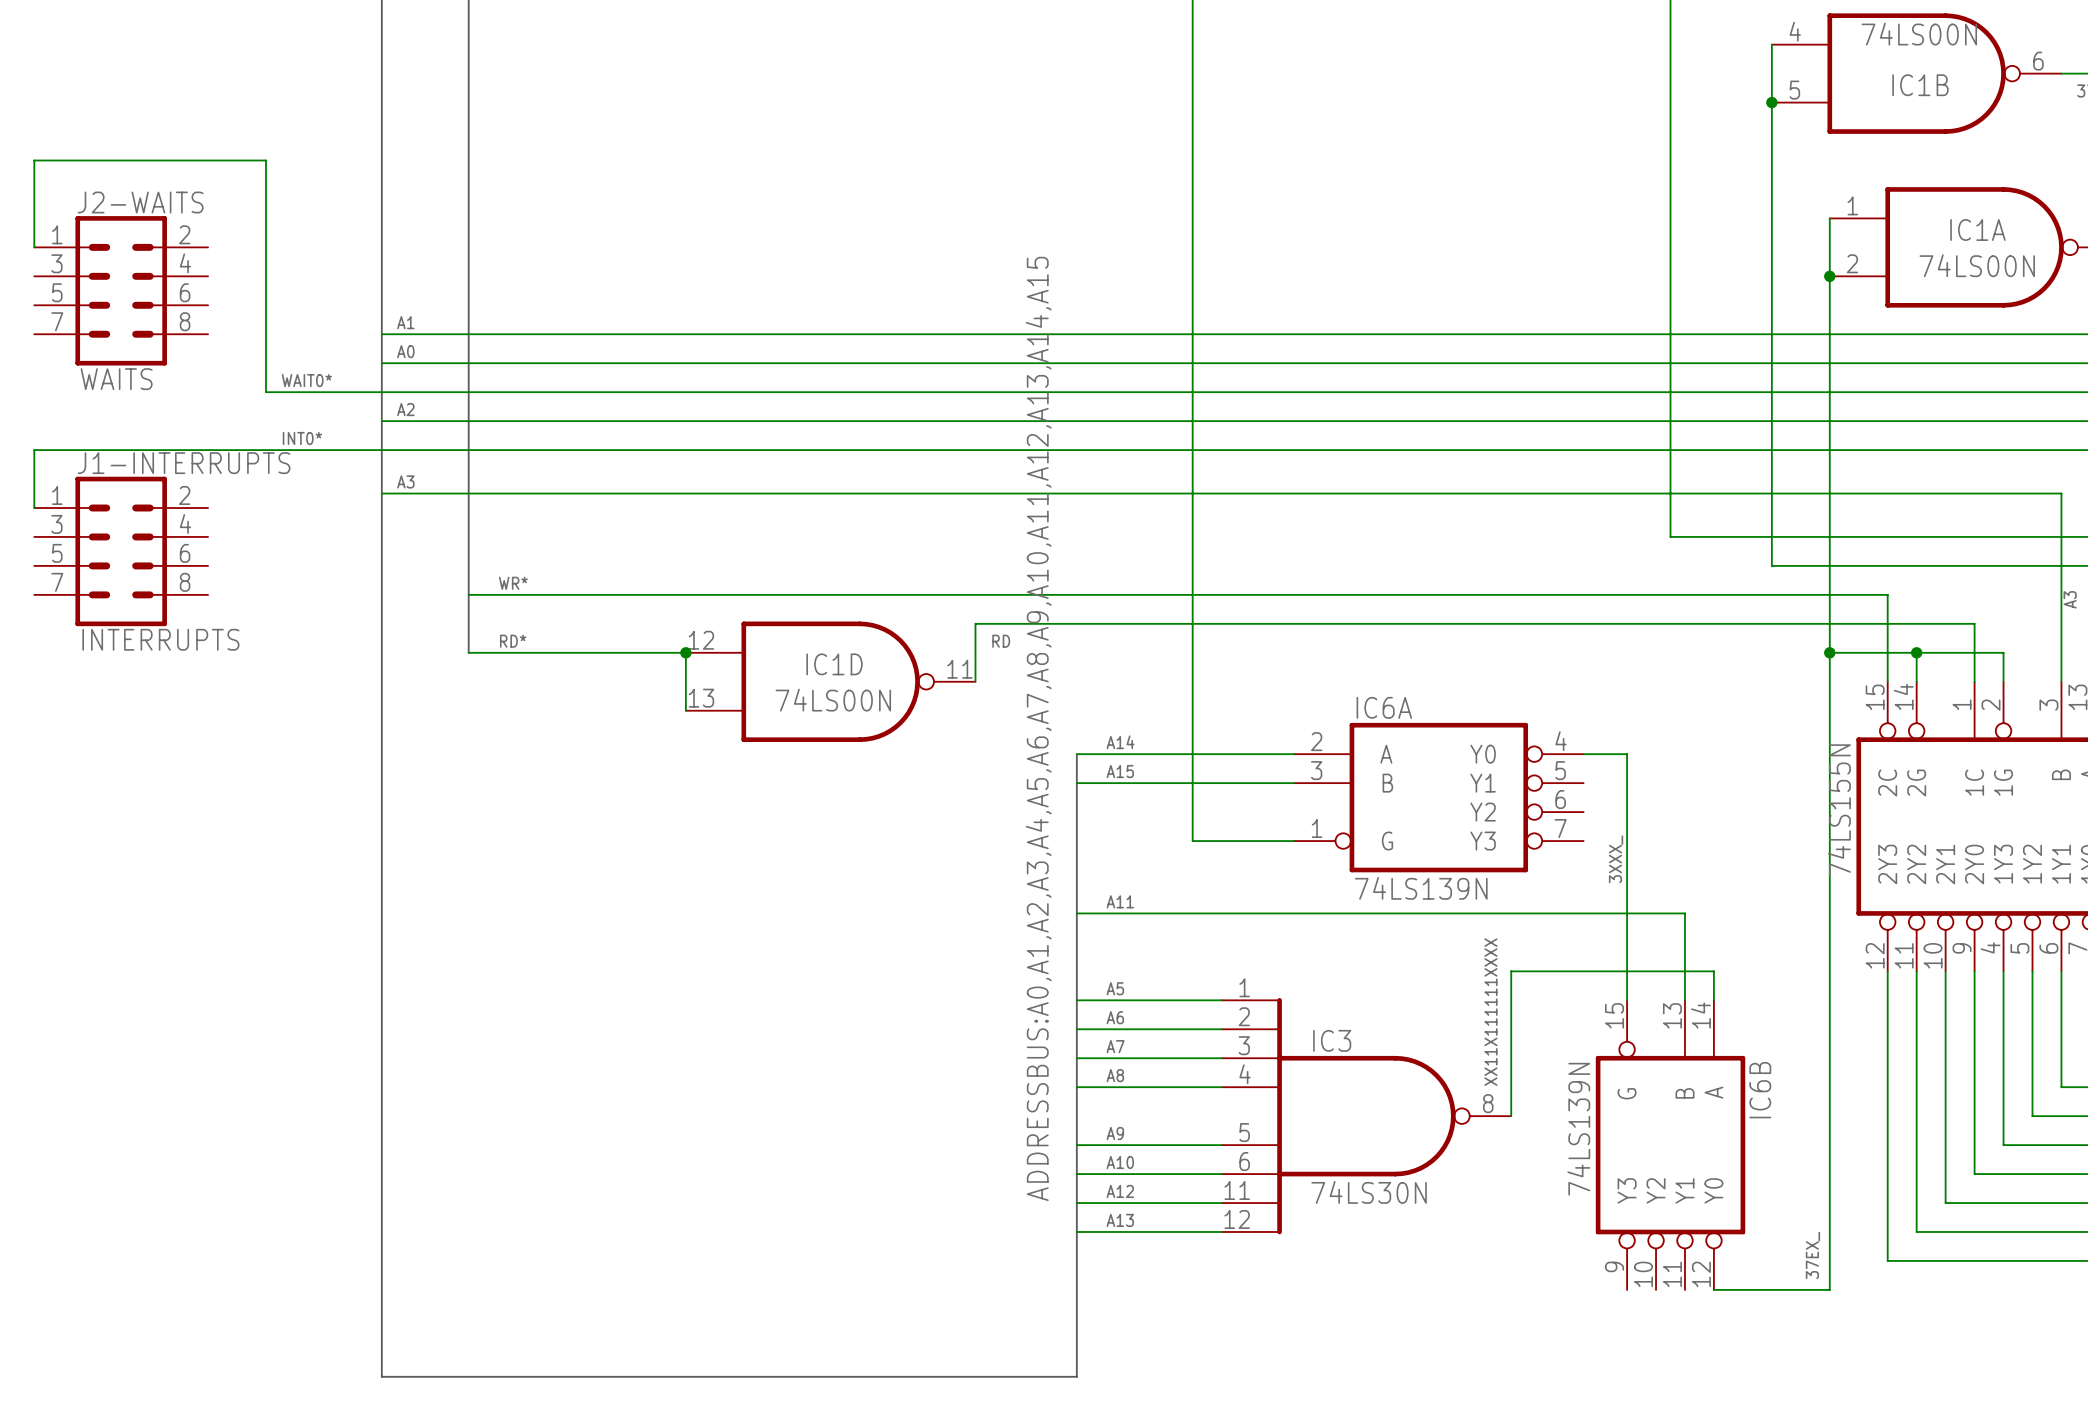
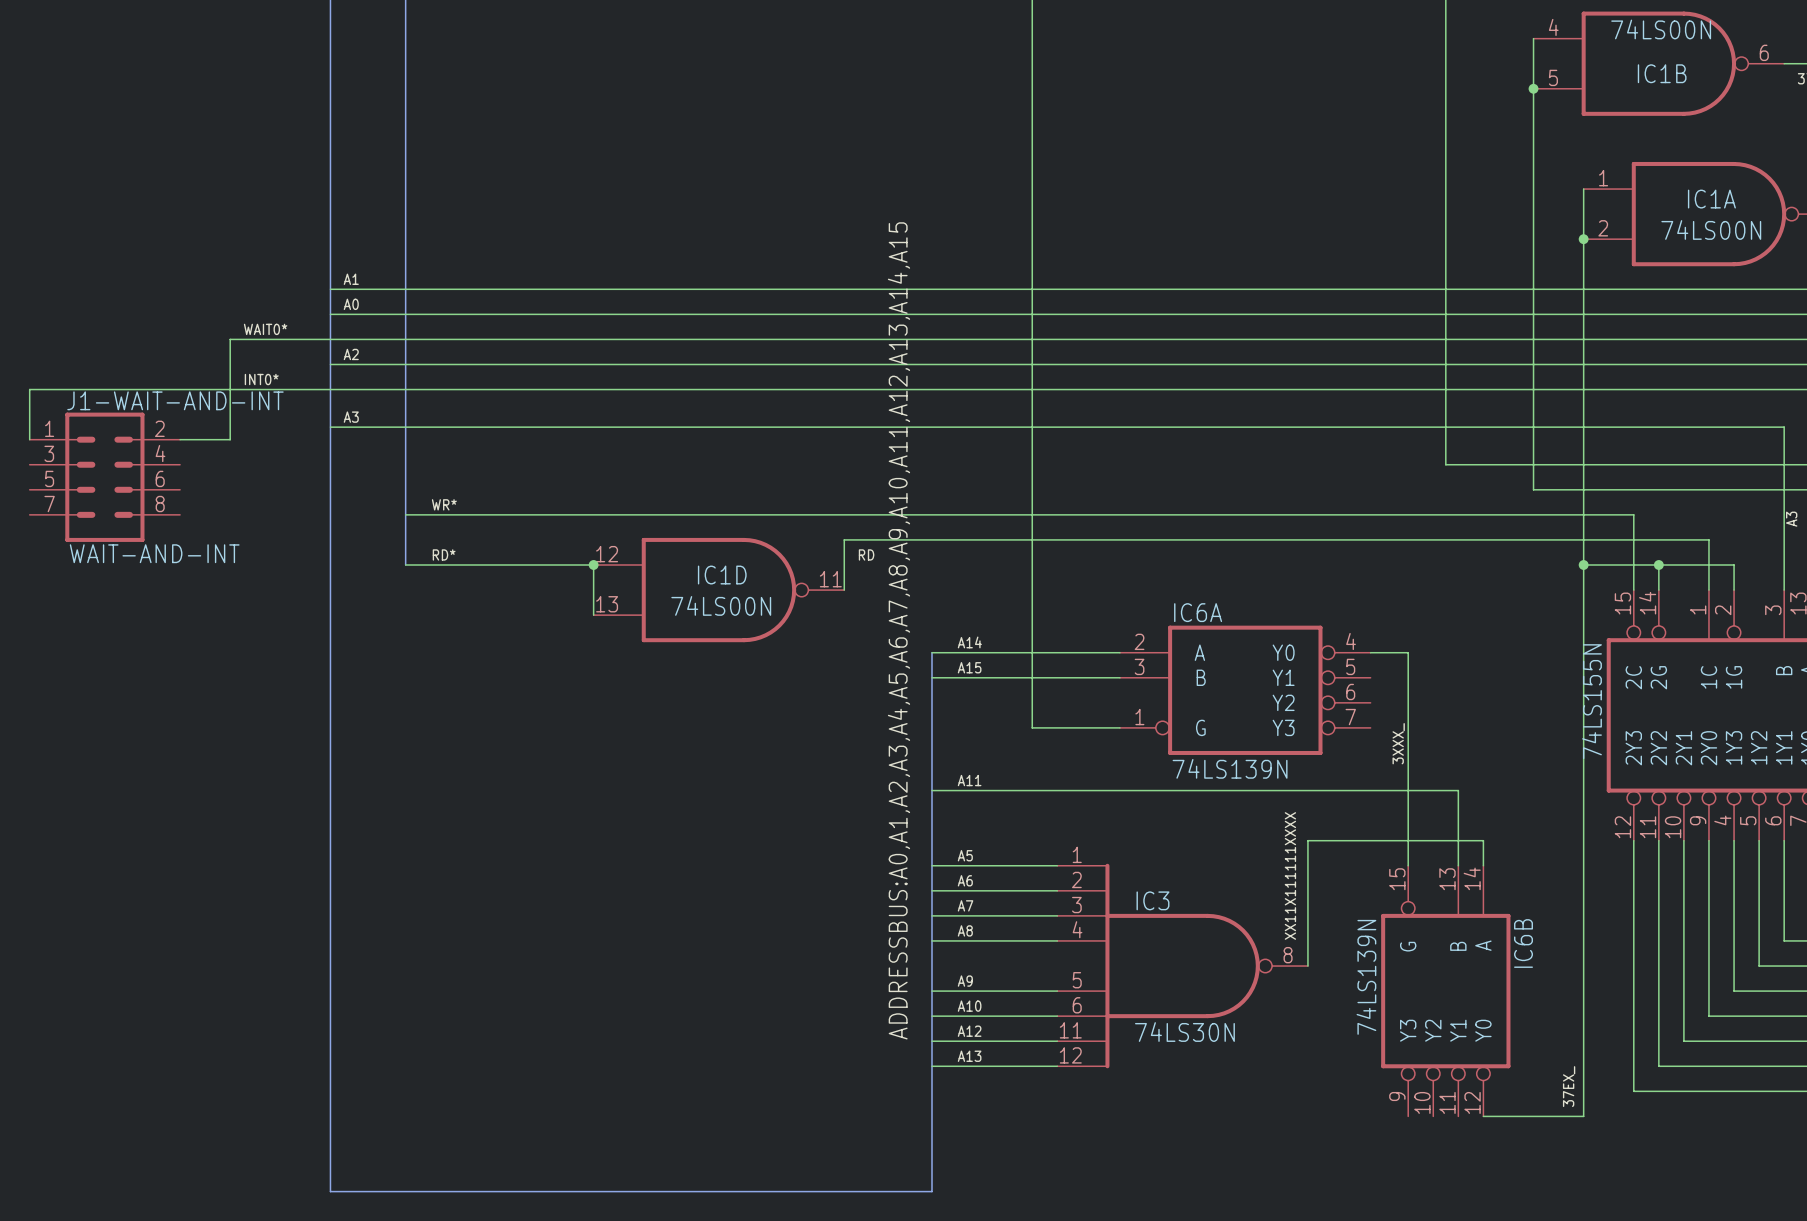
wire: (34, 247) (34, 160) (265, 160) (265, 392) -> (180, 439) (230, 439) (230, 339)
J2-WAITS: WAITS (121, 290) -> none
J1-INTERRUPTS name: J1-INTERRUPTS (184, 463) -> J1-WAIT-AND-INT (175, 400)
J1-INTERRUPTS value: INTERRUPTS (160, 639) -> WAIT-AND-INT (154, 553)

